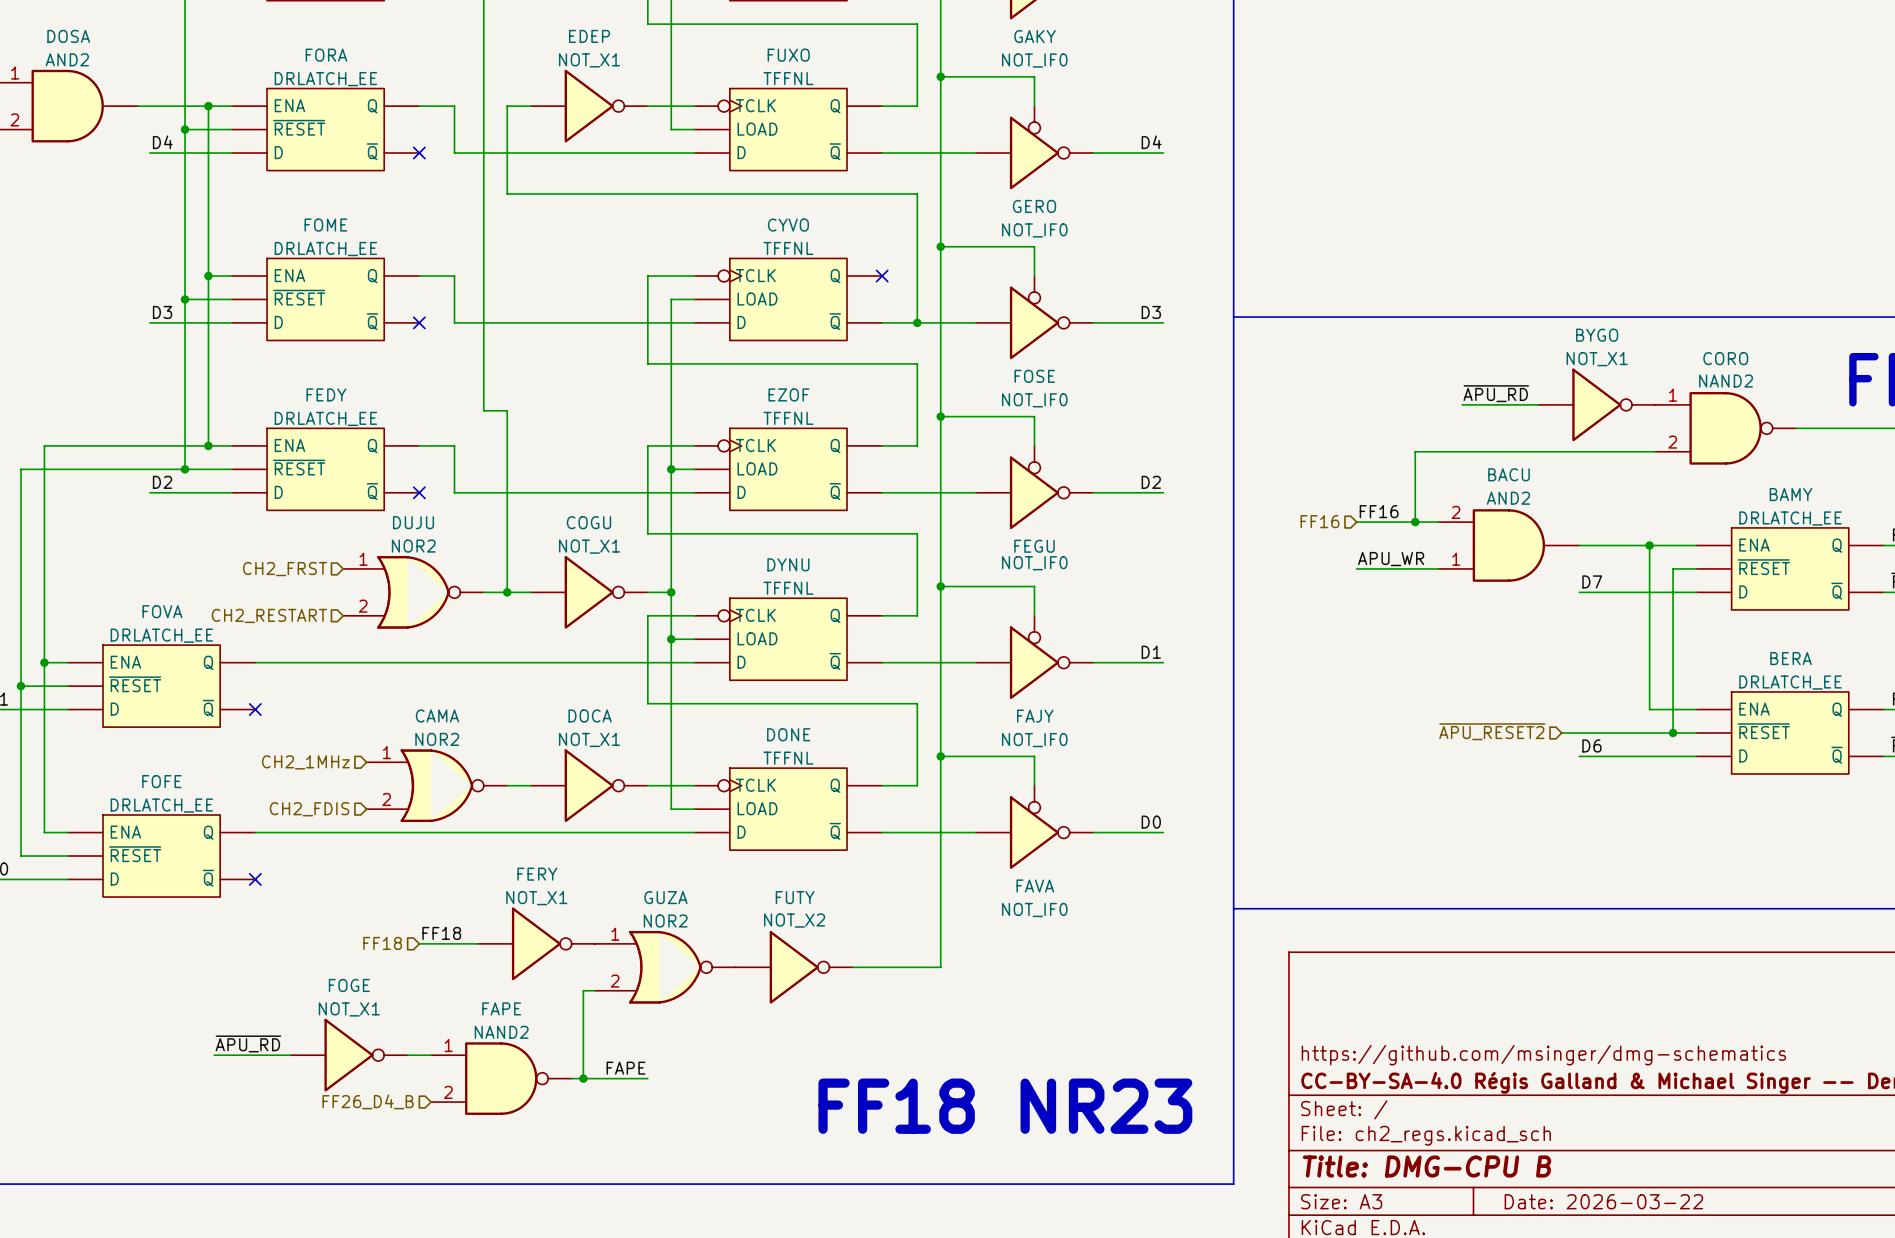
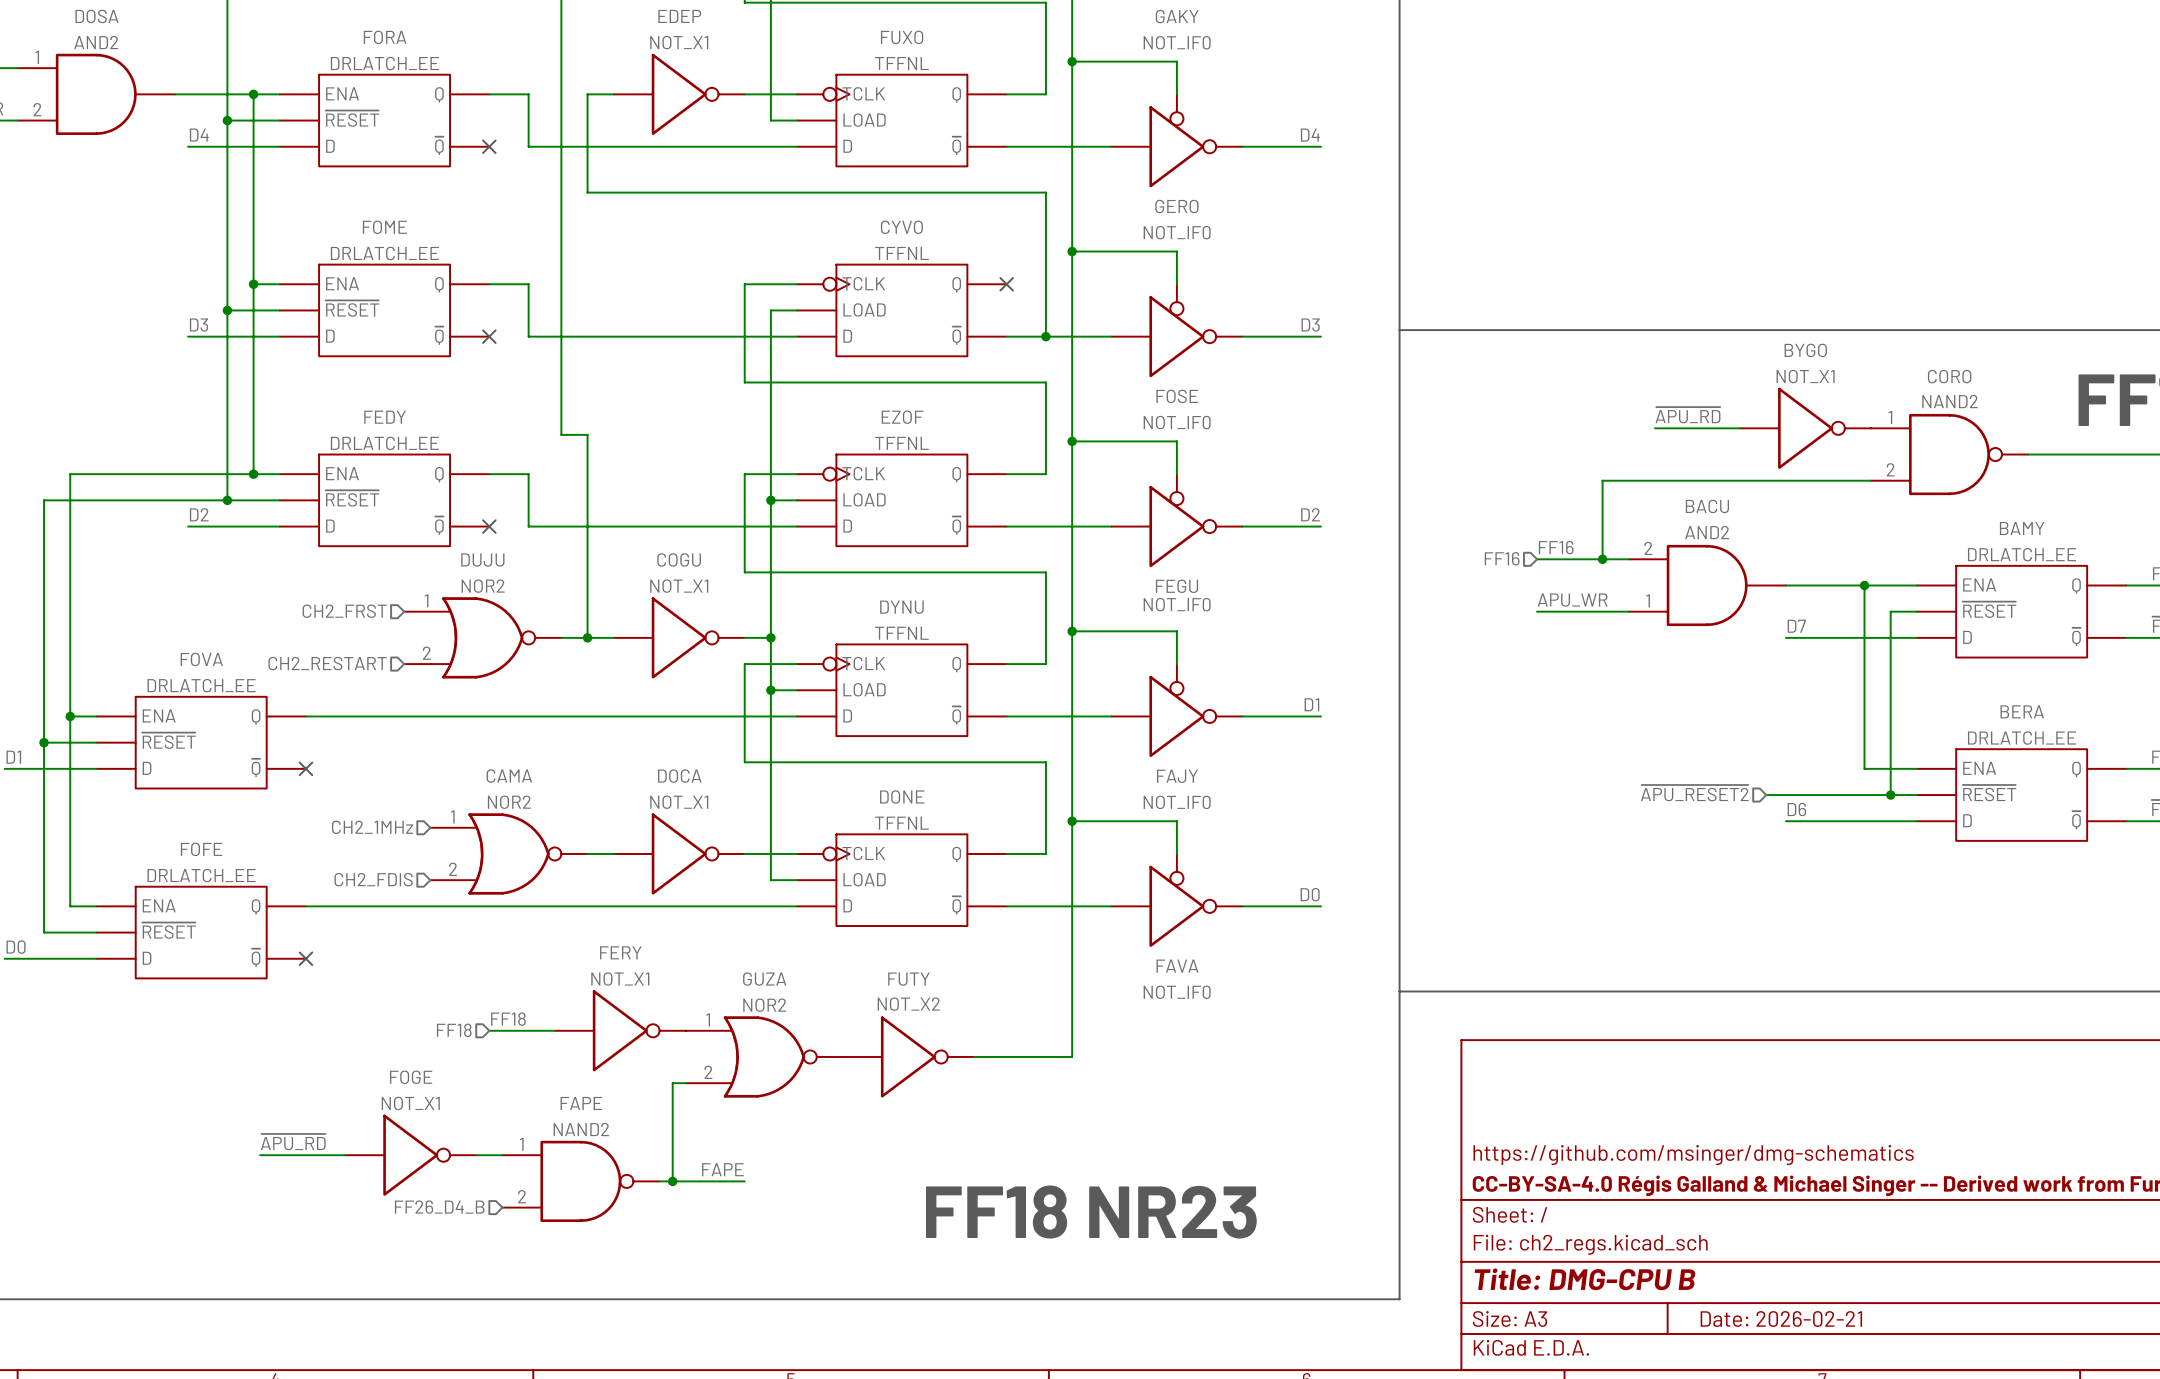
title block: Date: 2026-03-22 (1603, 1201) -> Date: 2026-02-21 (1781, 1319)

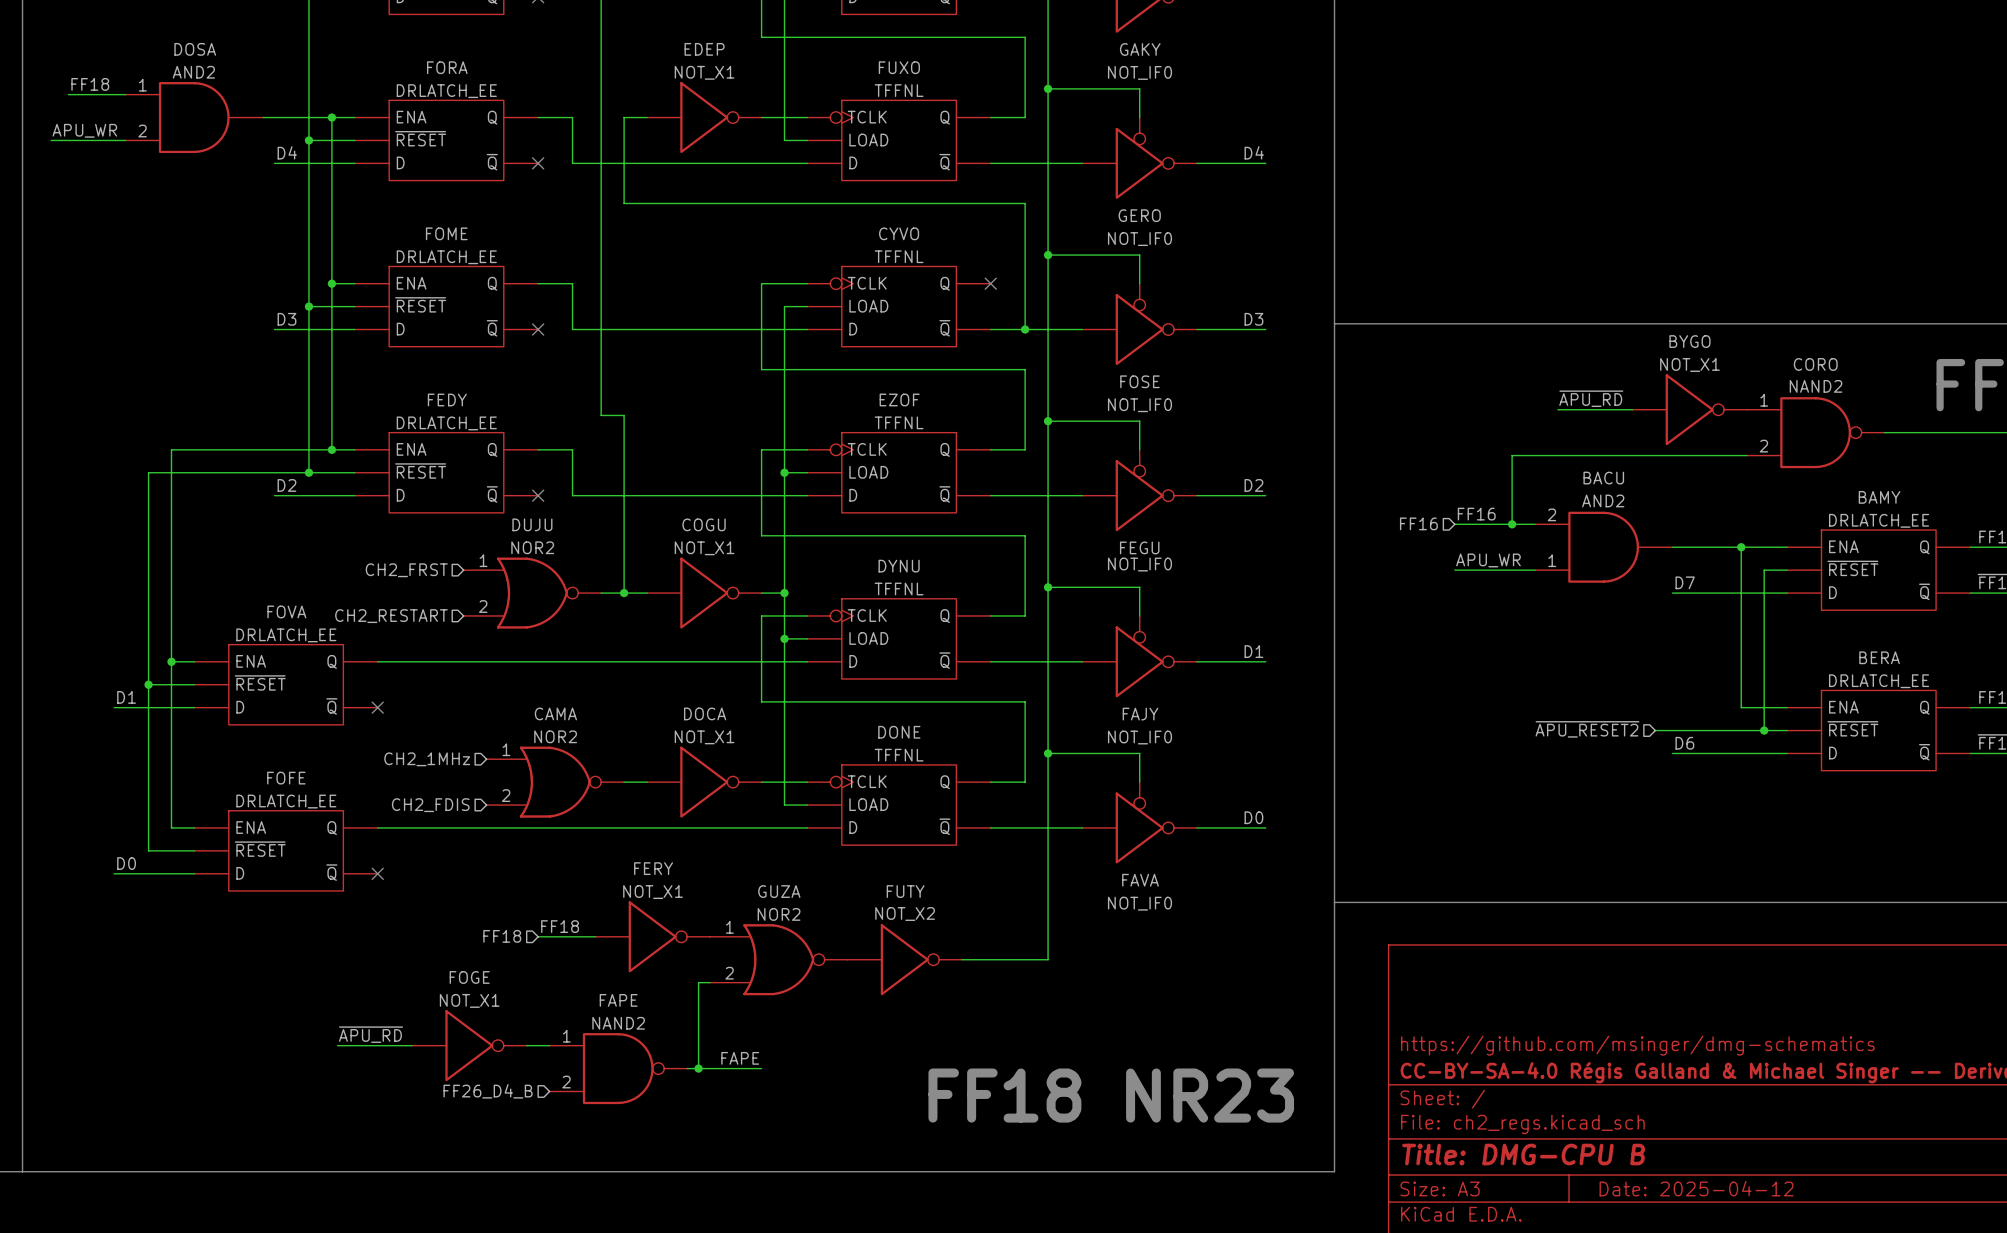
title block: Date: 2026-02-21 (1781, 1319) -> Date: 2025-04-12 (1696, 1188)

